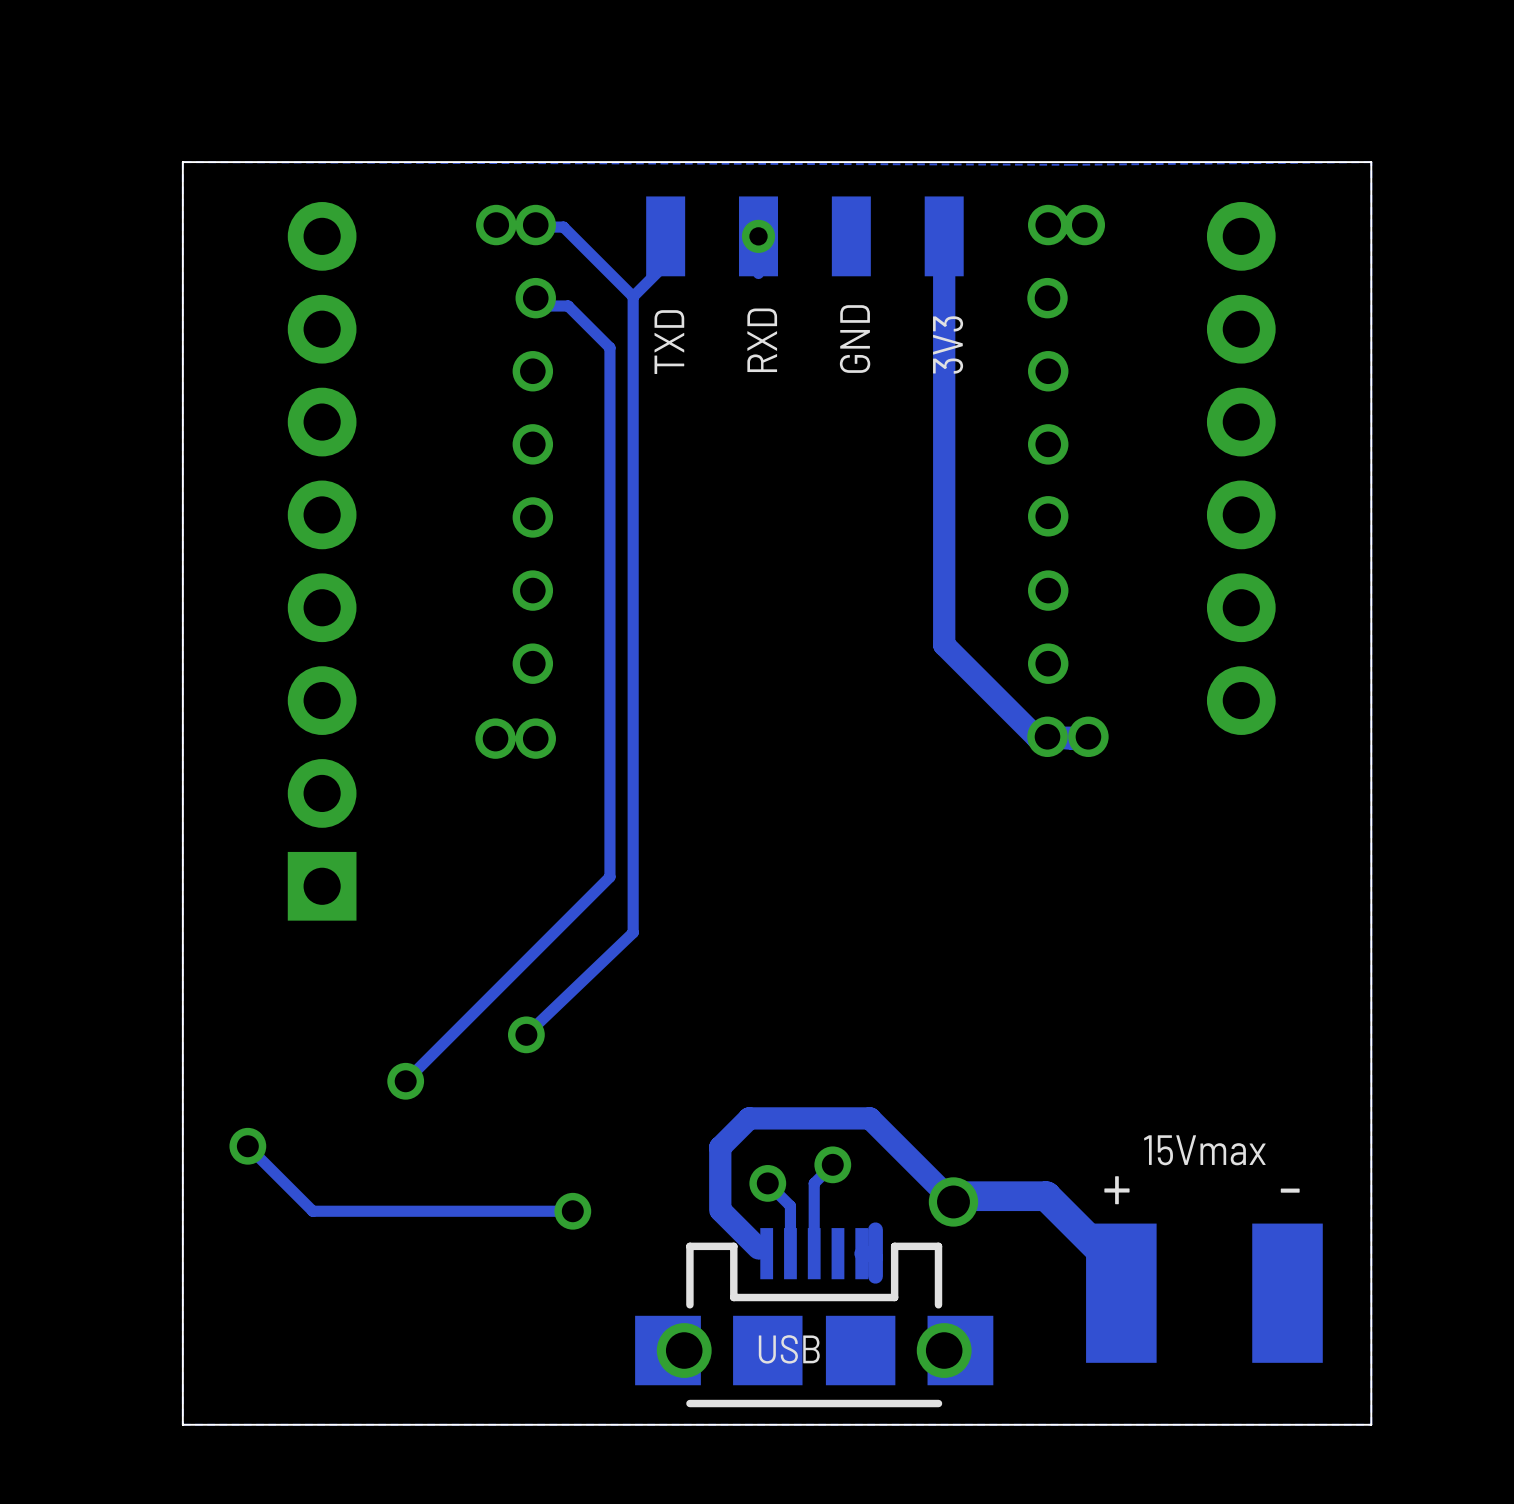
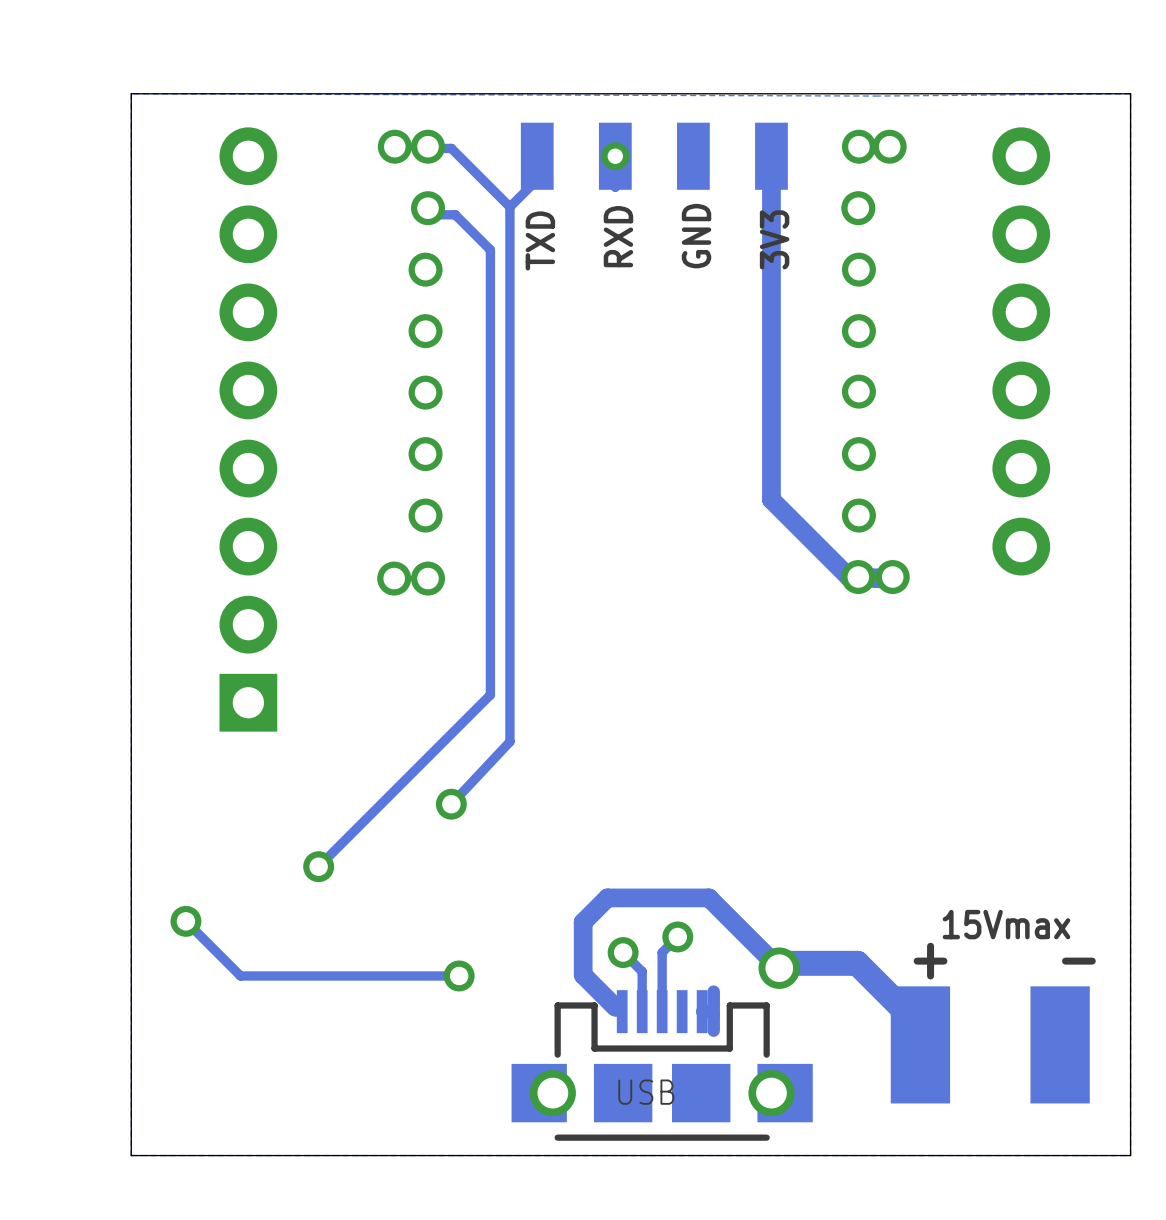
track: (633, 932) (526, 1034) -> (509, 741) (451, 804)
via position: (526, 1034) -> (451, 804)

